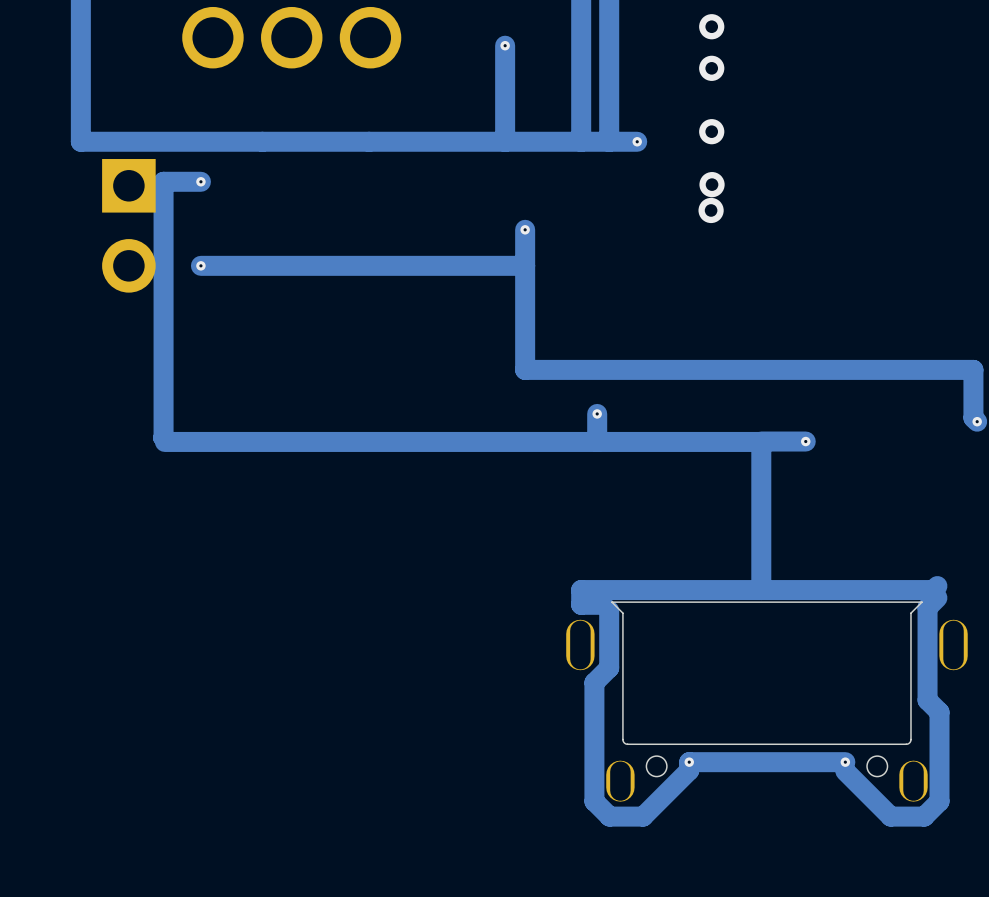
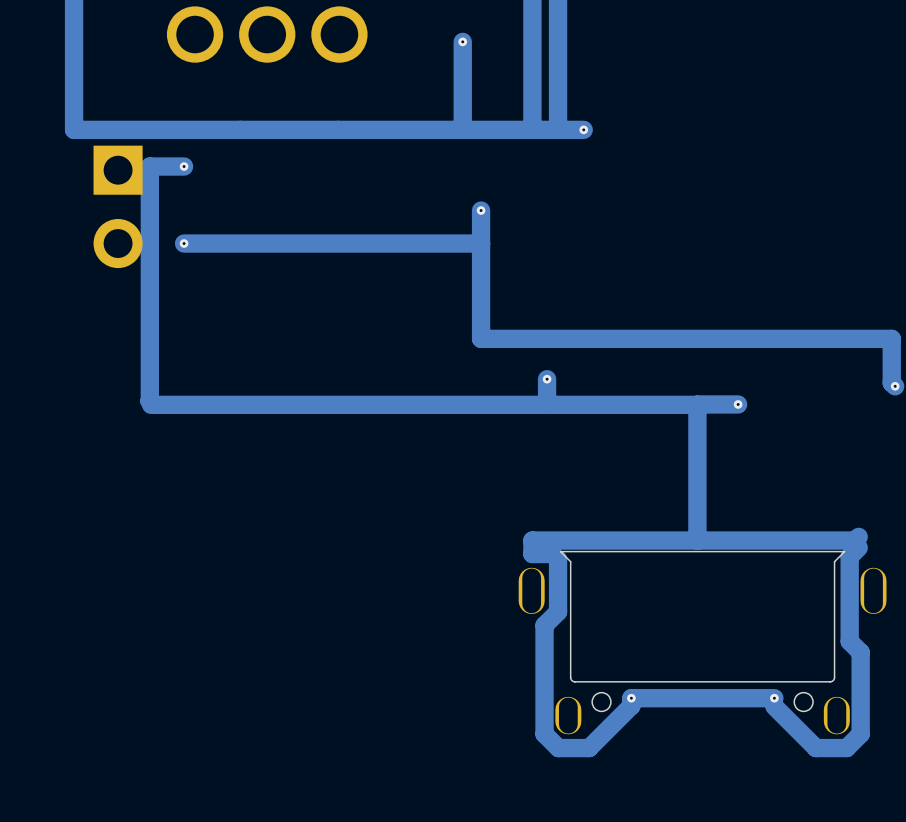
via: (711, 26) -> none
via: (711, 68) -> none
via: (711, 131) -> none
via: (712, 184) -> none
via: (711, 210) -> none

